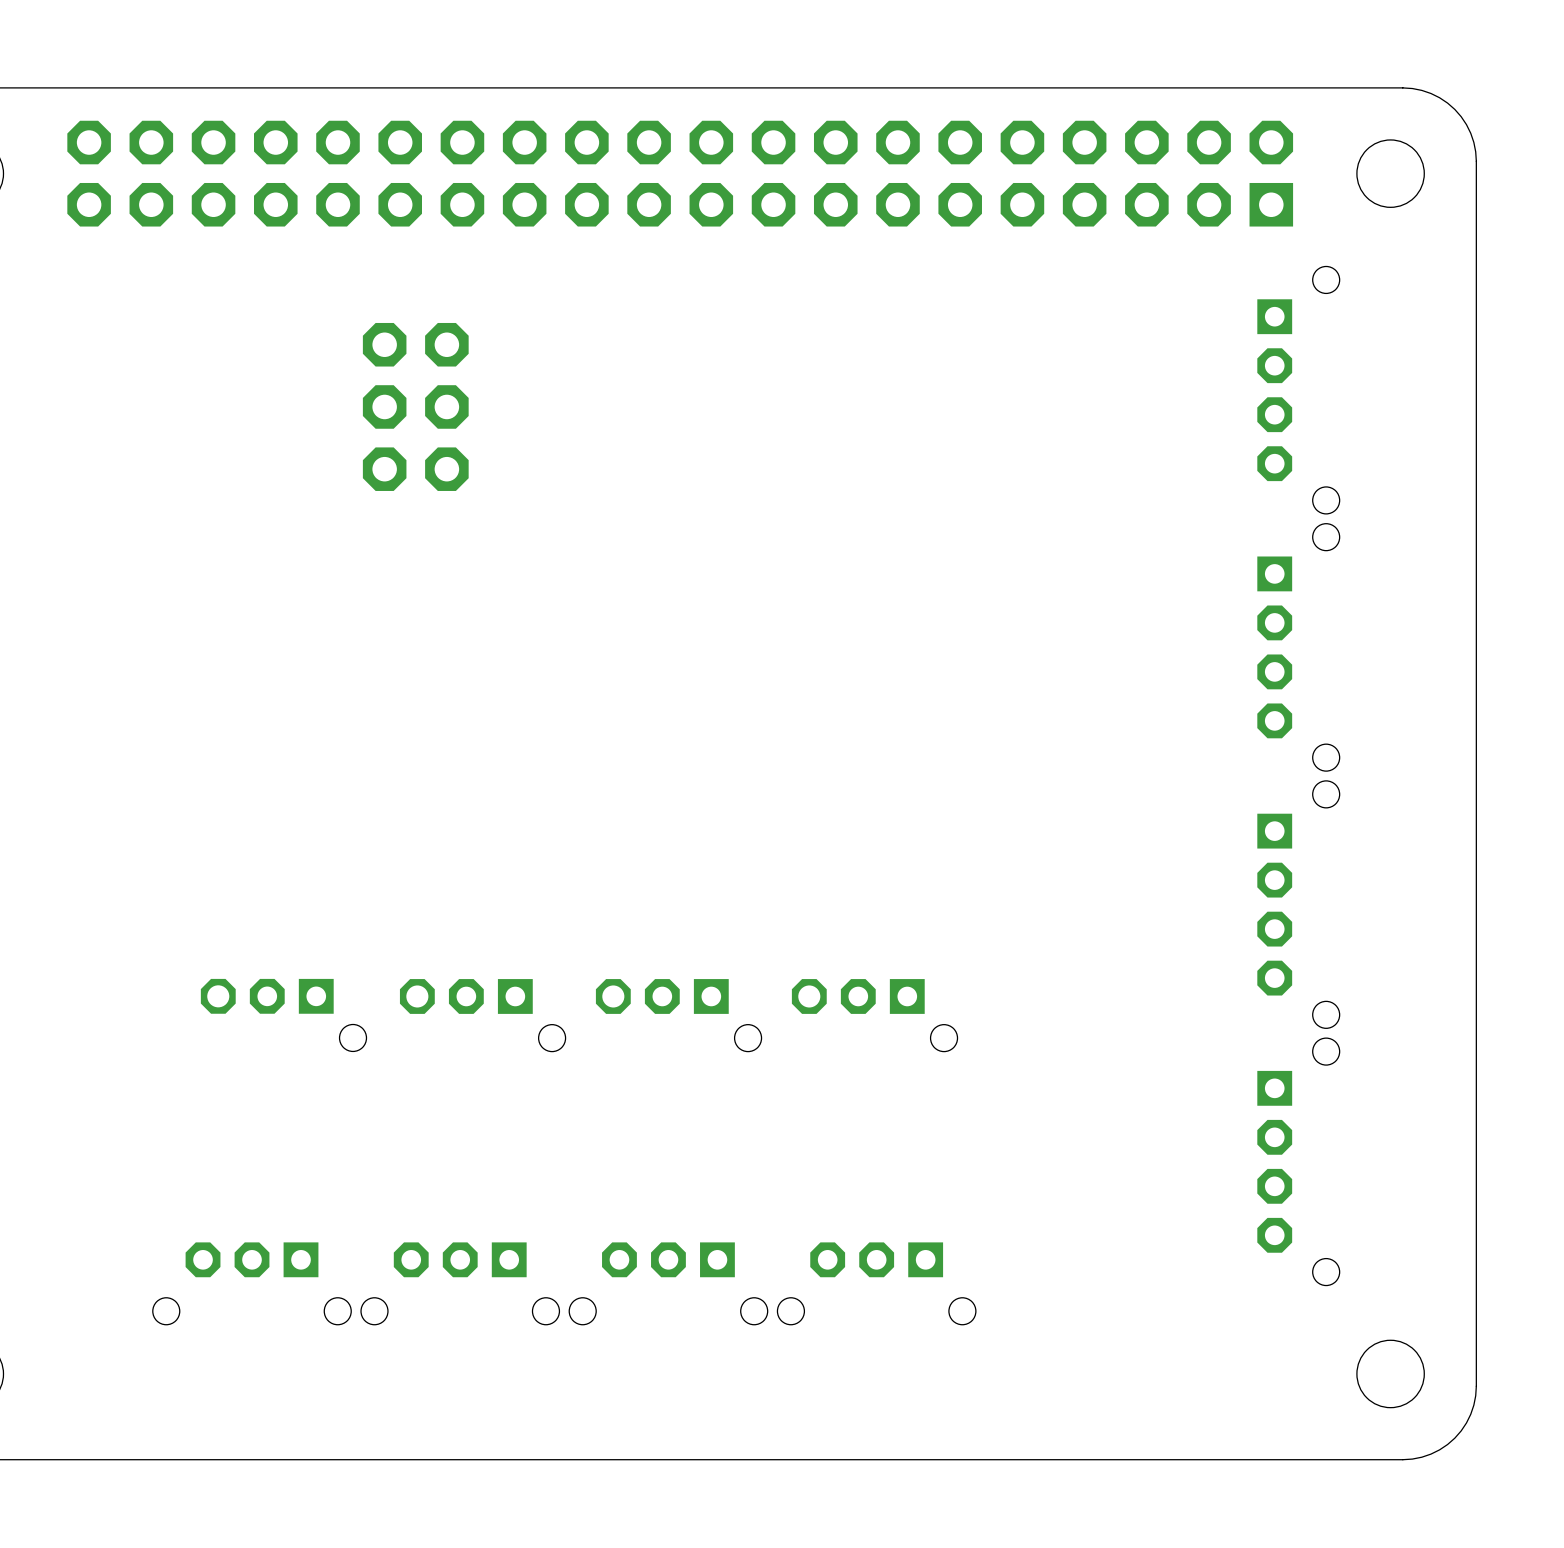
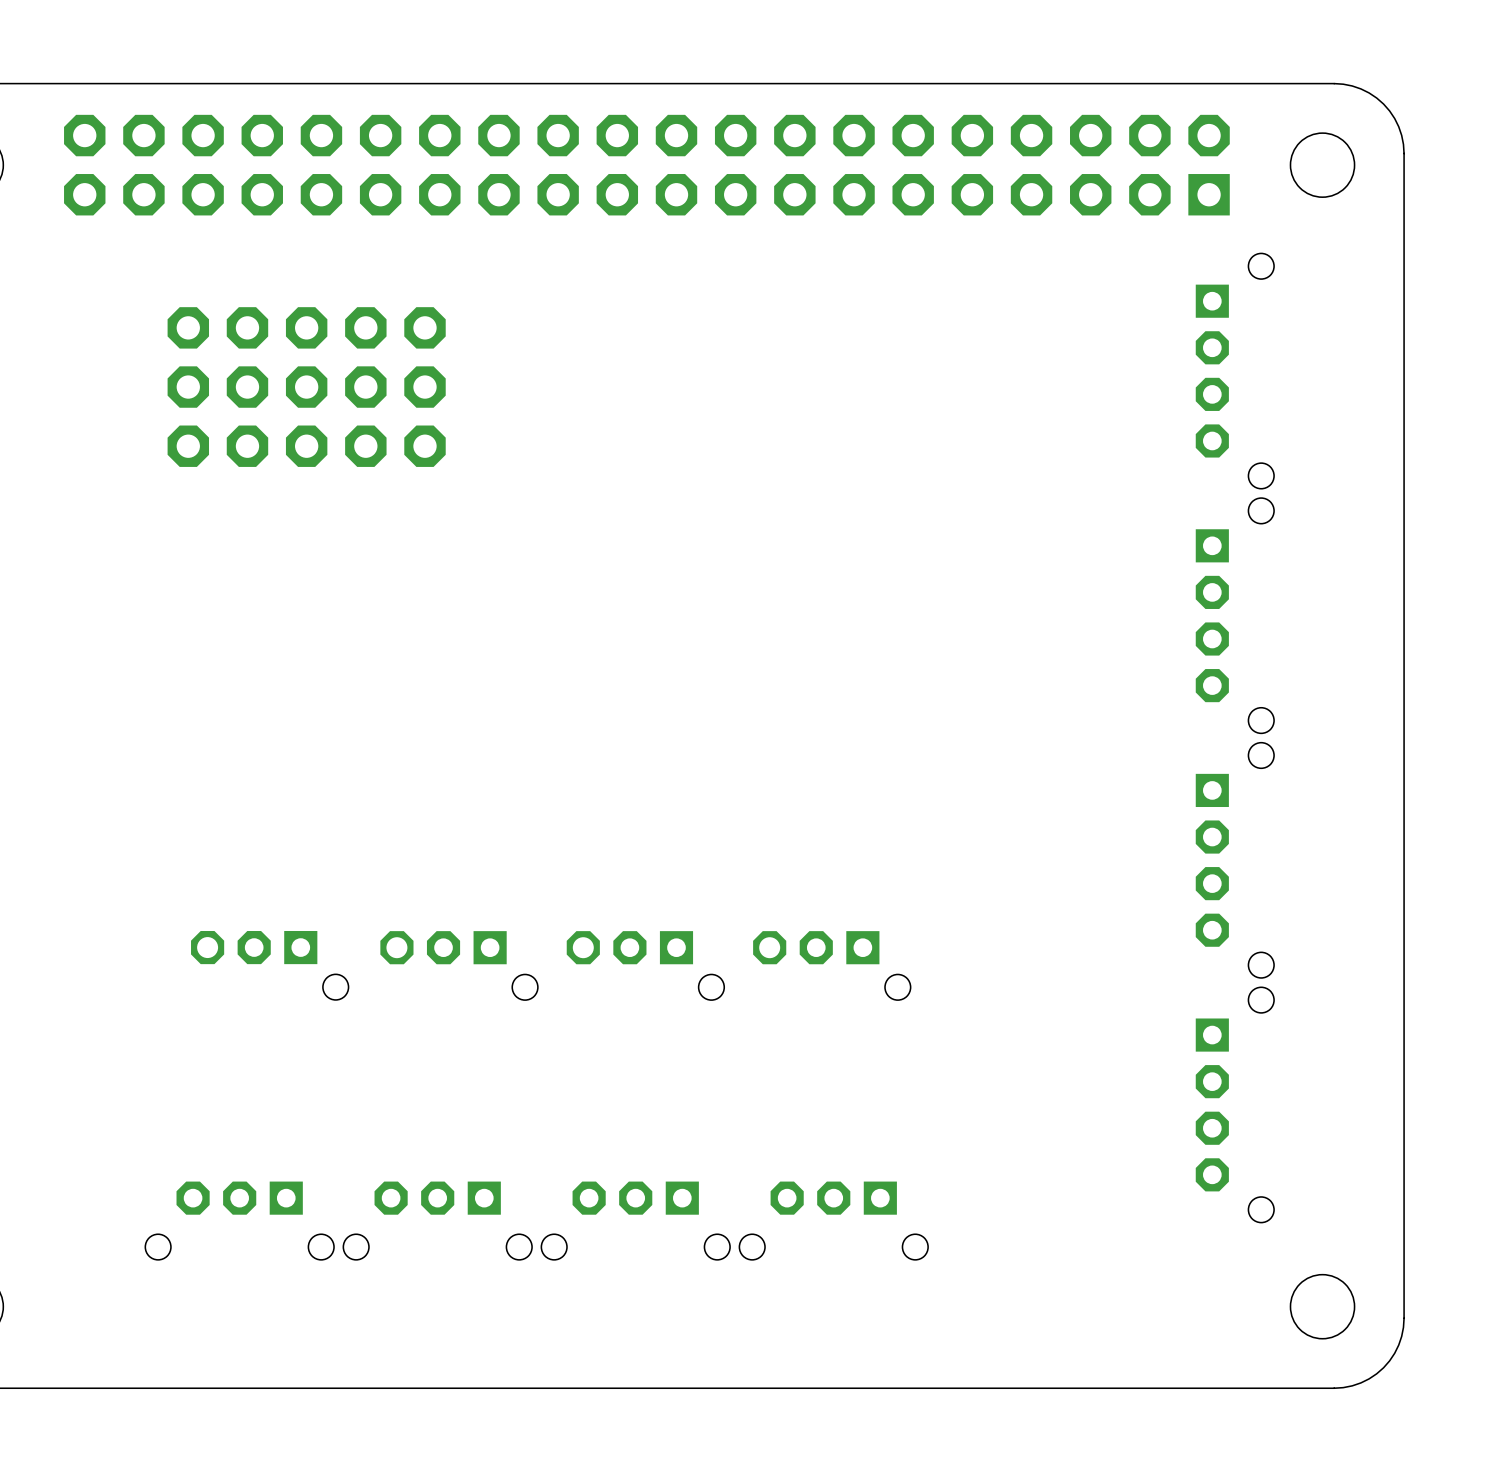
part: none -> (188, 387)
part: none -> (247, 387)
part: none -> (306, 387)

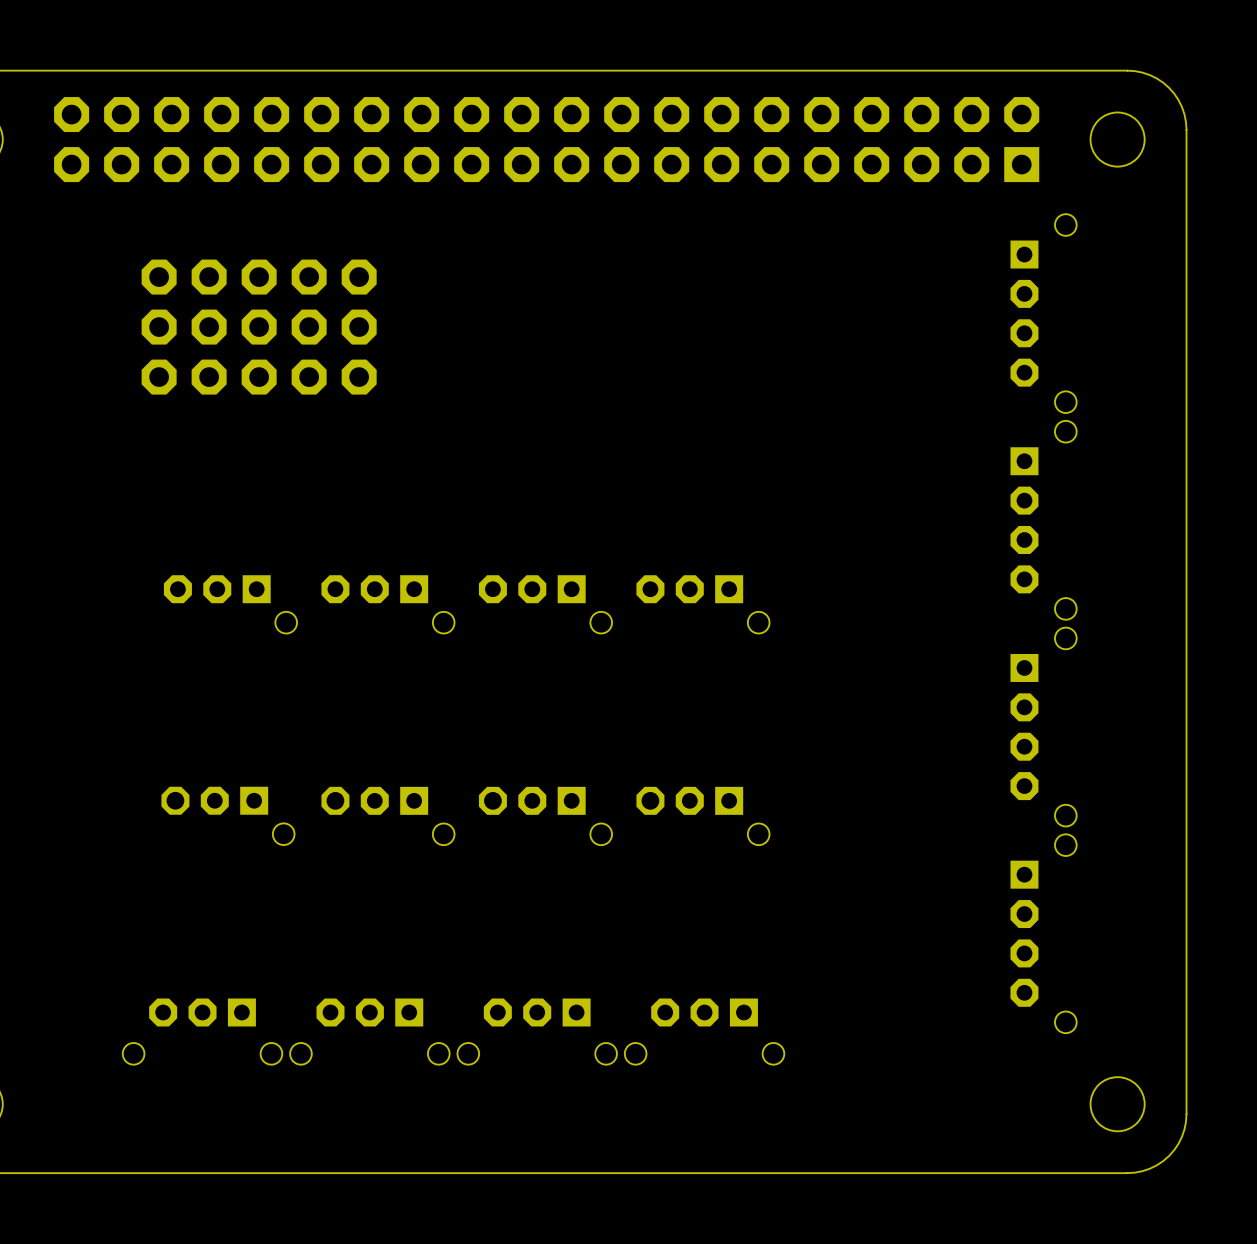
part: none -> (230, 604)
part: none -> (387, 604)
part: none -> (545, 604)
part: none -> (702, 604)

